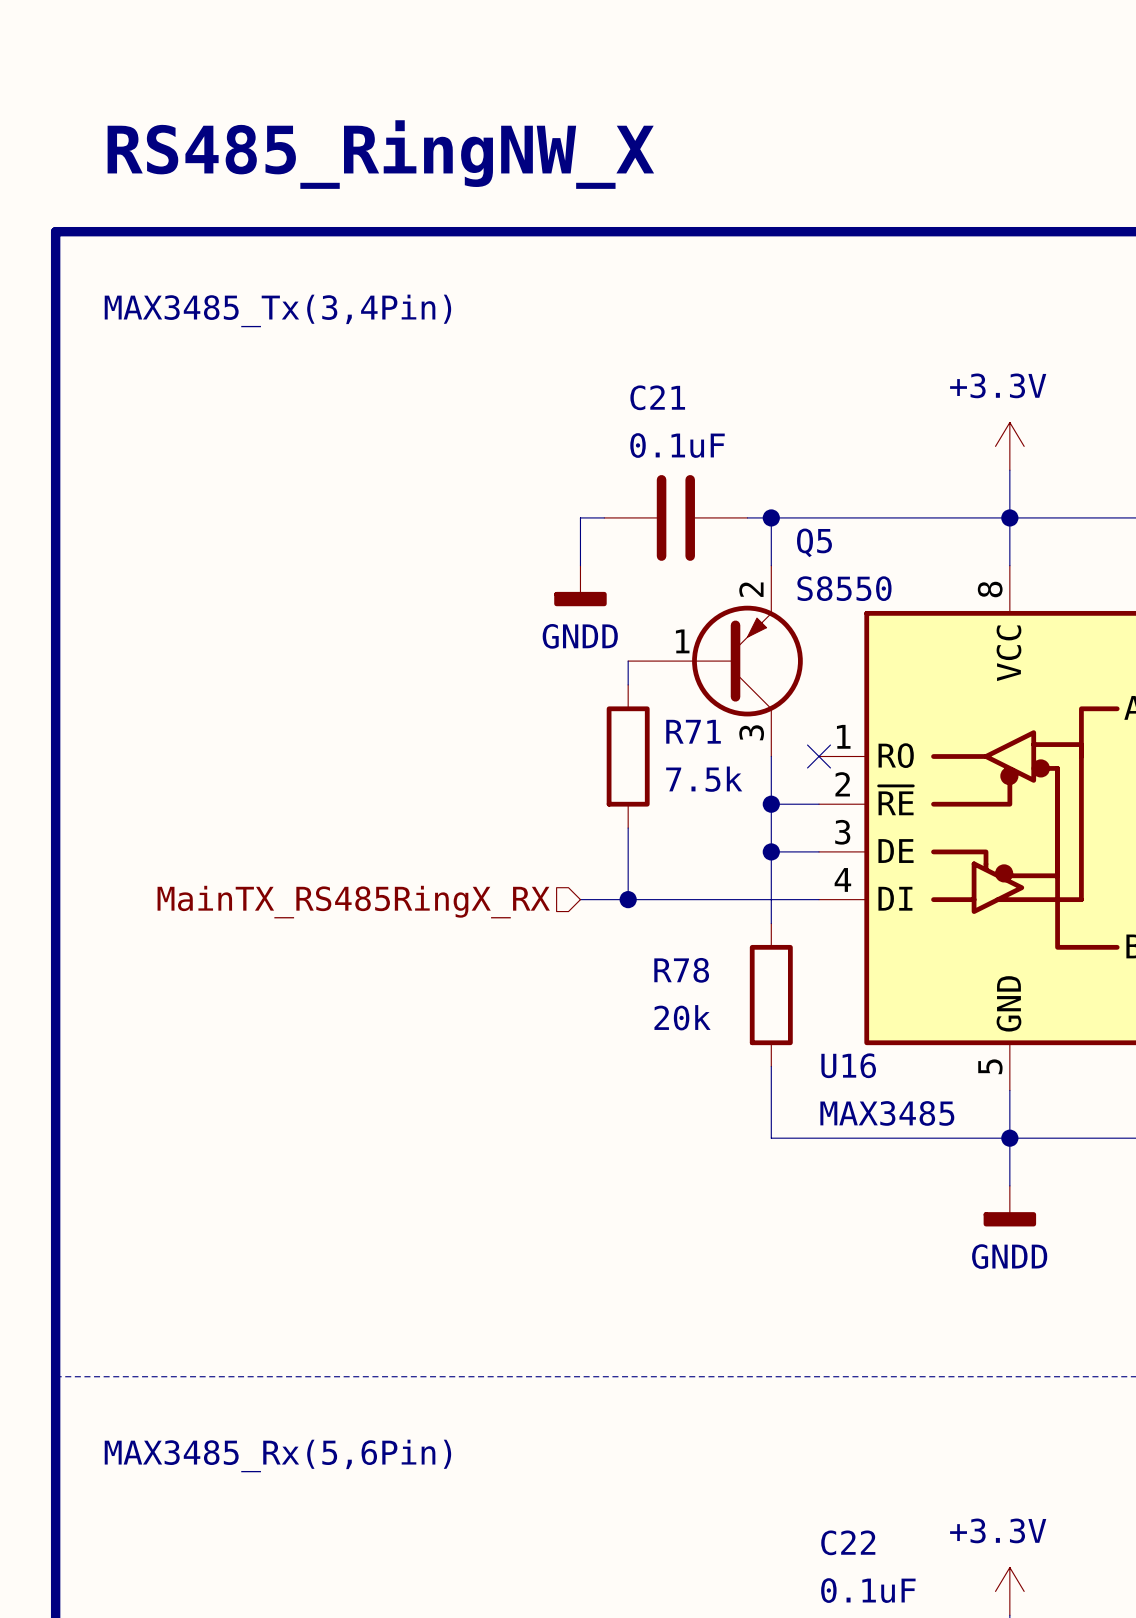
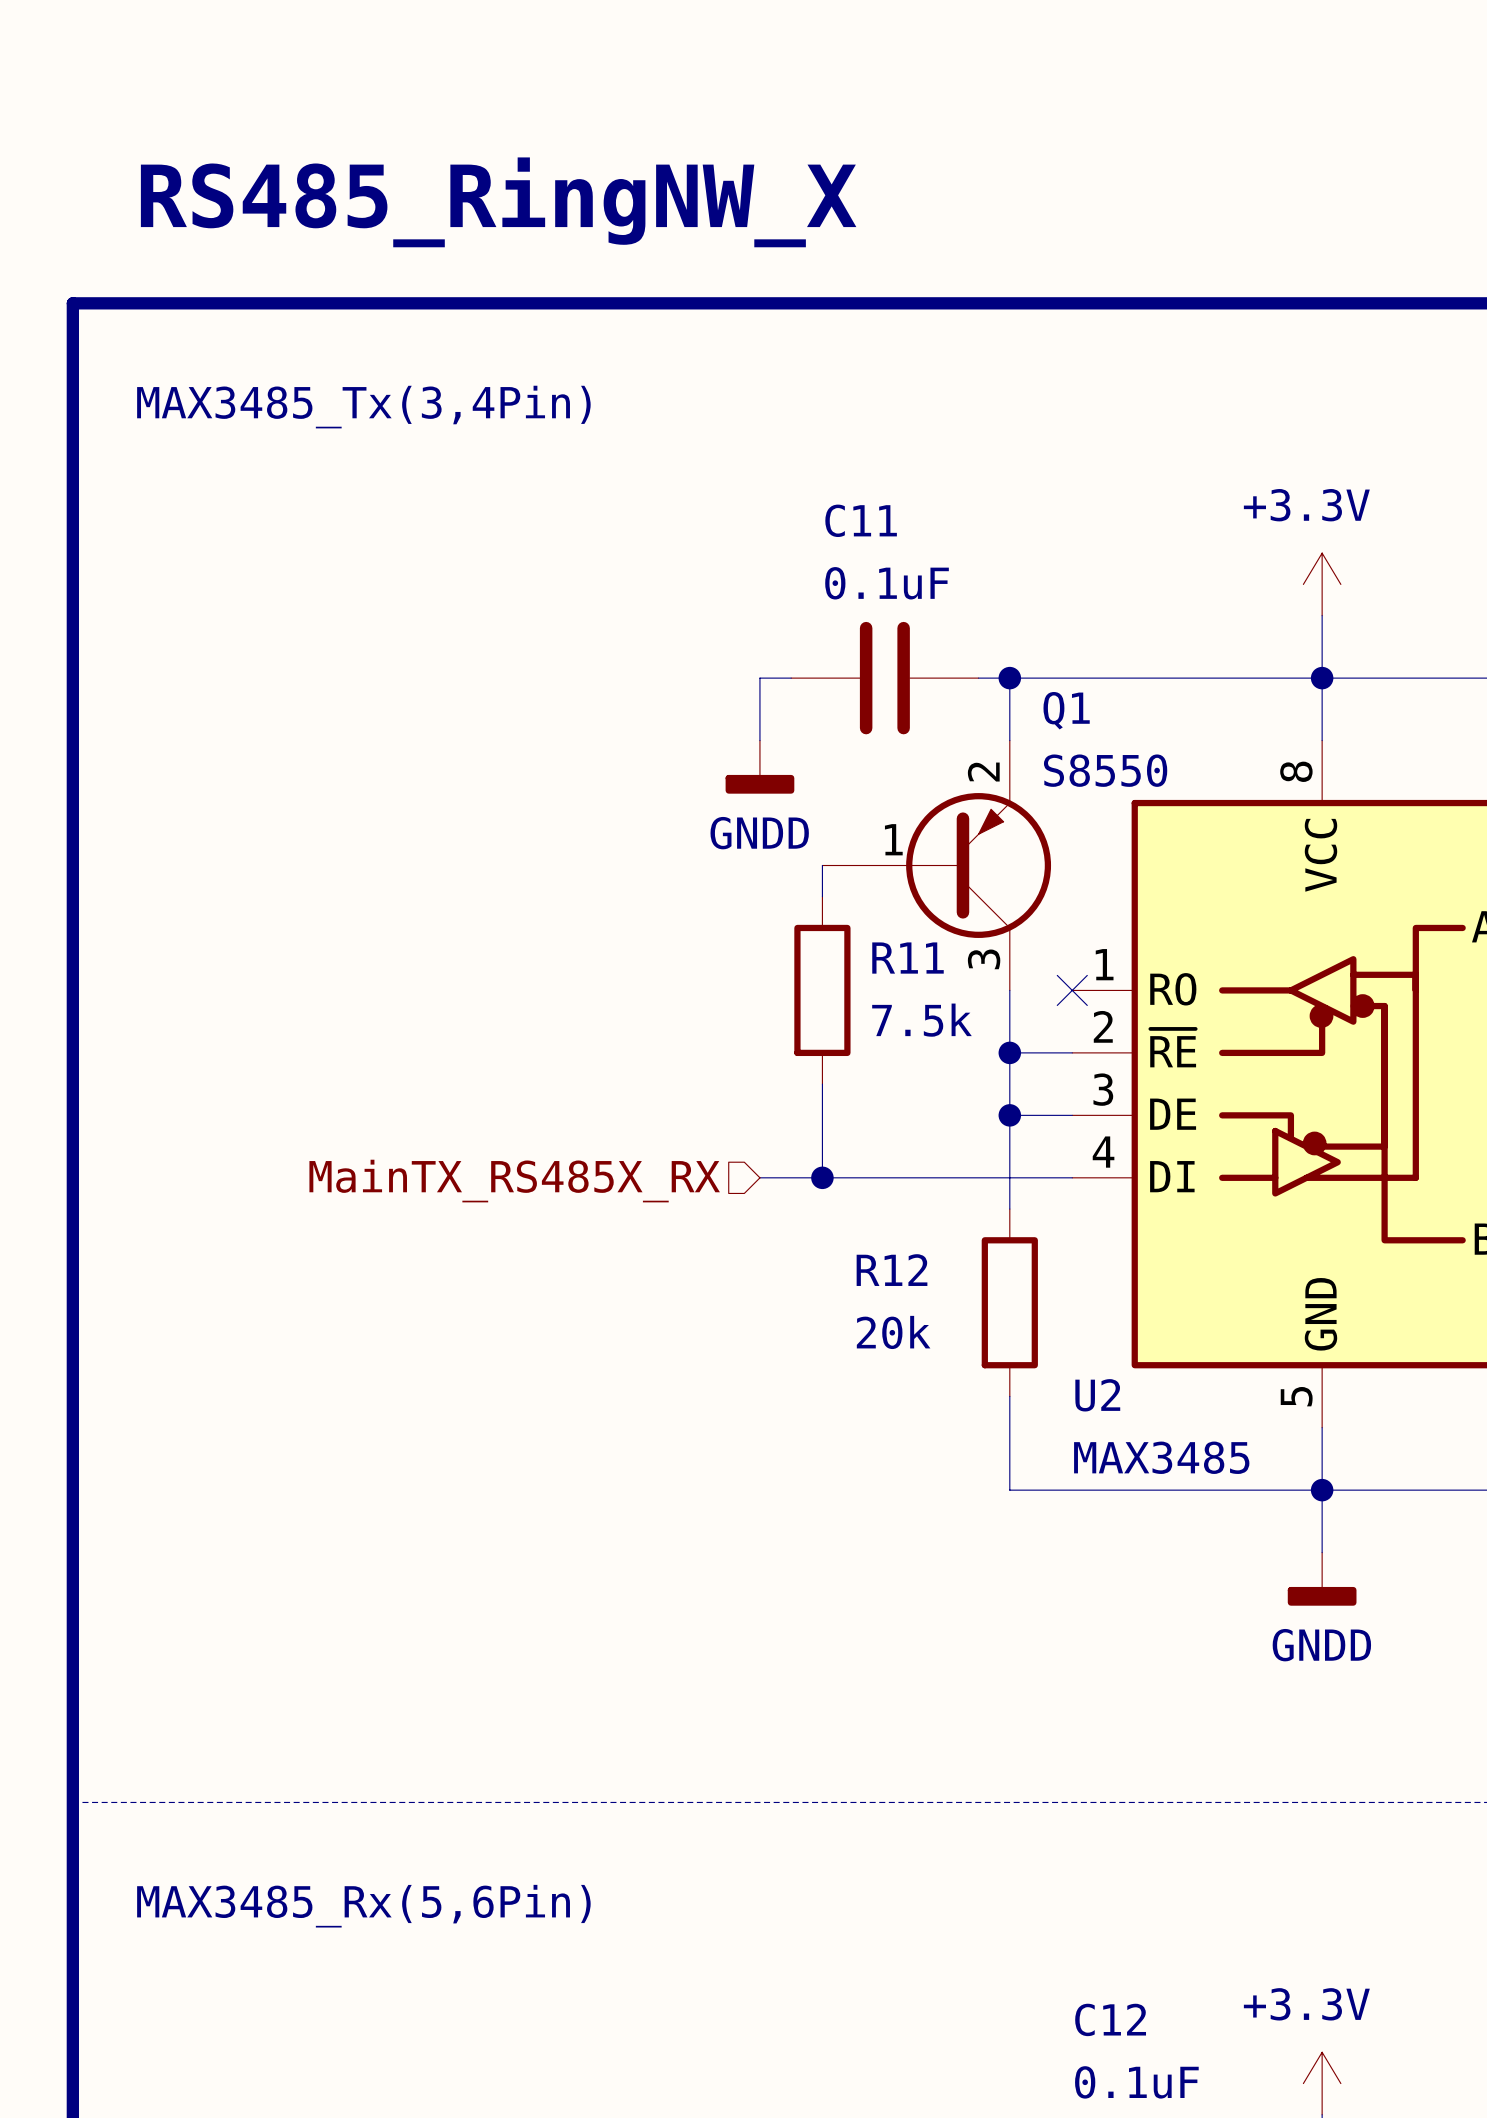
C21 name: C21 (657, 397) -> C11 (861, 520)
Q5 name: Q5 (814, 542) -> Q1 (1066, 710)
R71 name: R71 (693, 731) -> R11 (908, 958)
hierarchical label: MainTX_RS485RingX_RX (353, 902) -> MainTX_RS485X_RX (514, 1181)
R78 name: R78 (681, 970) -> R12 (892, 1270)
U16 name: U16 (848, 1065) -> U2 (1097, 1395)
C22 name: C22 (848, 1542) -> C12 (1110, 2019)

